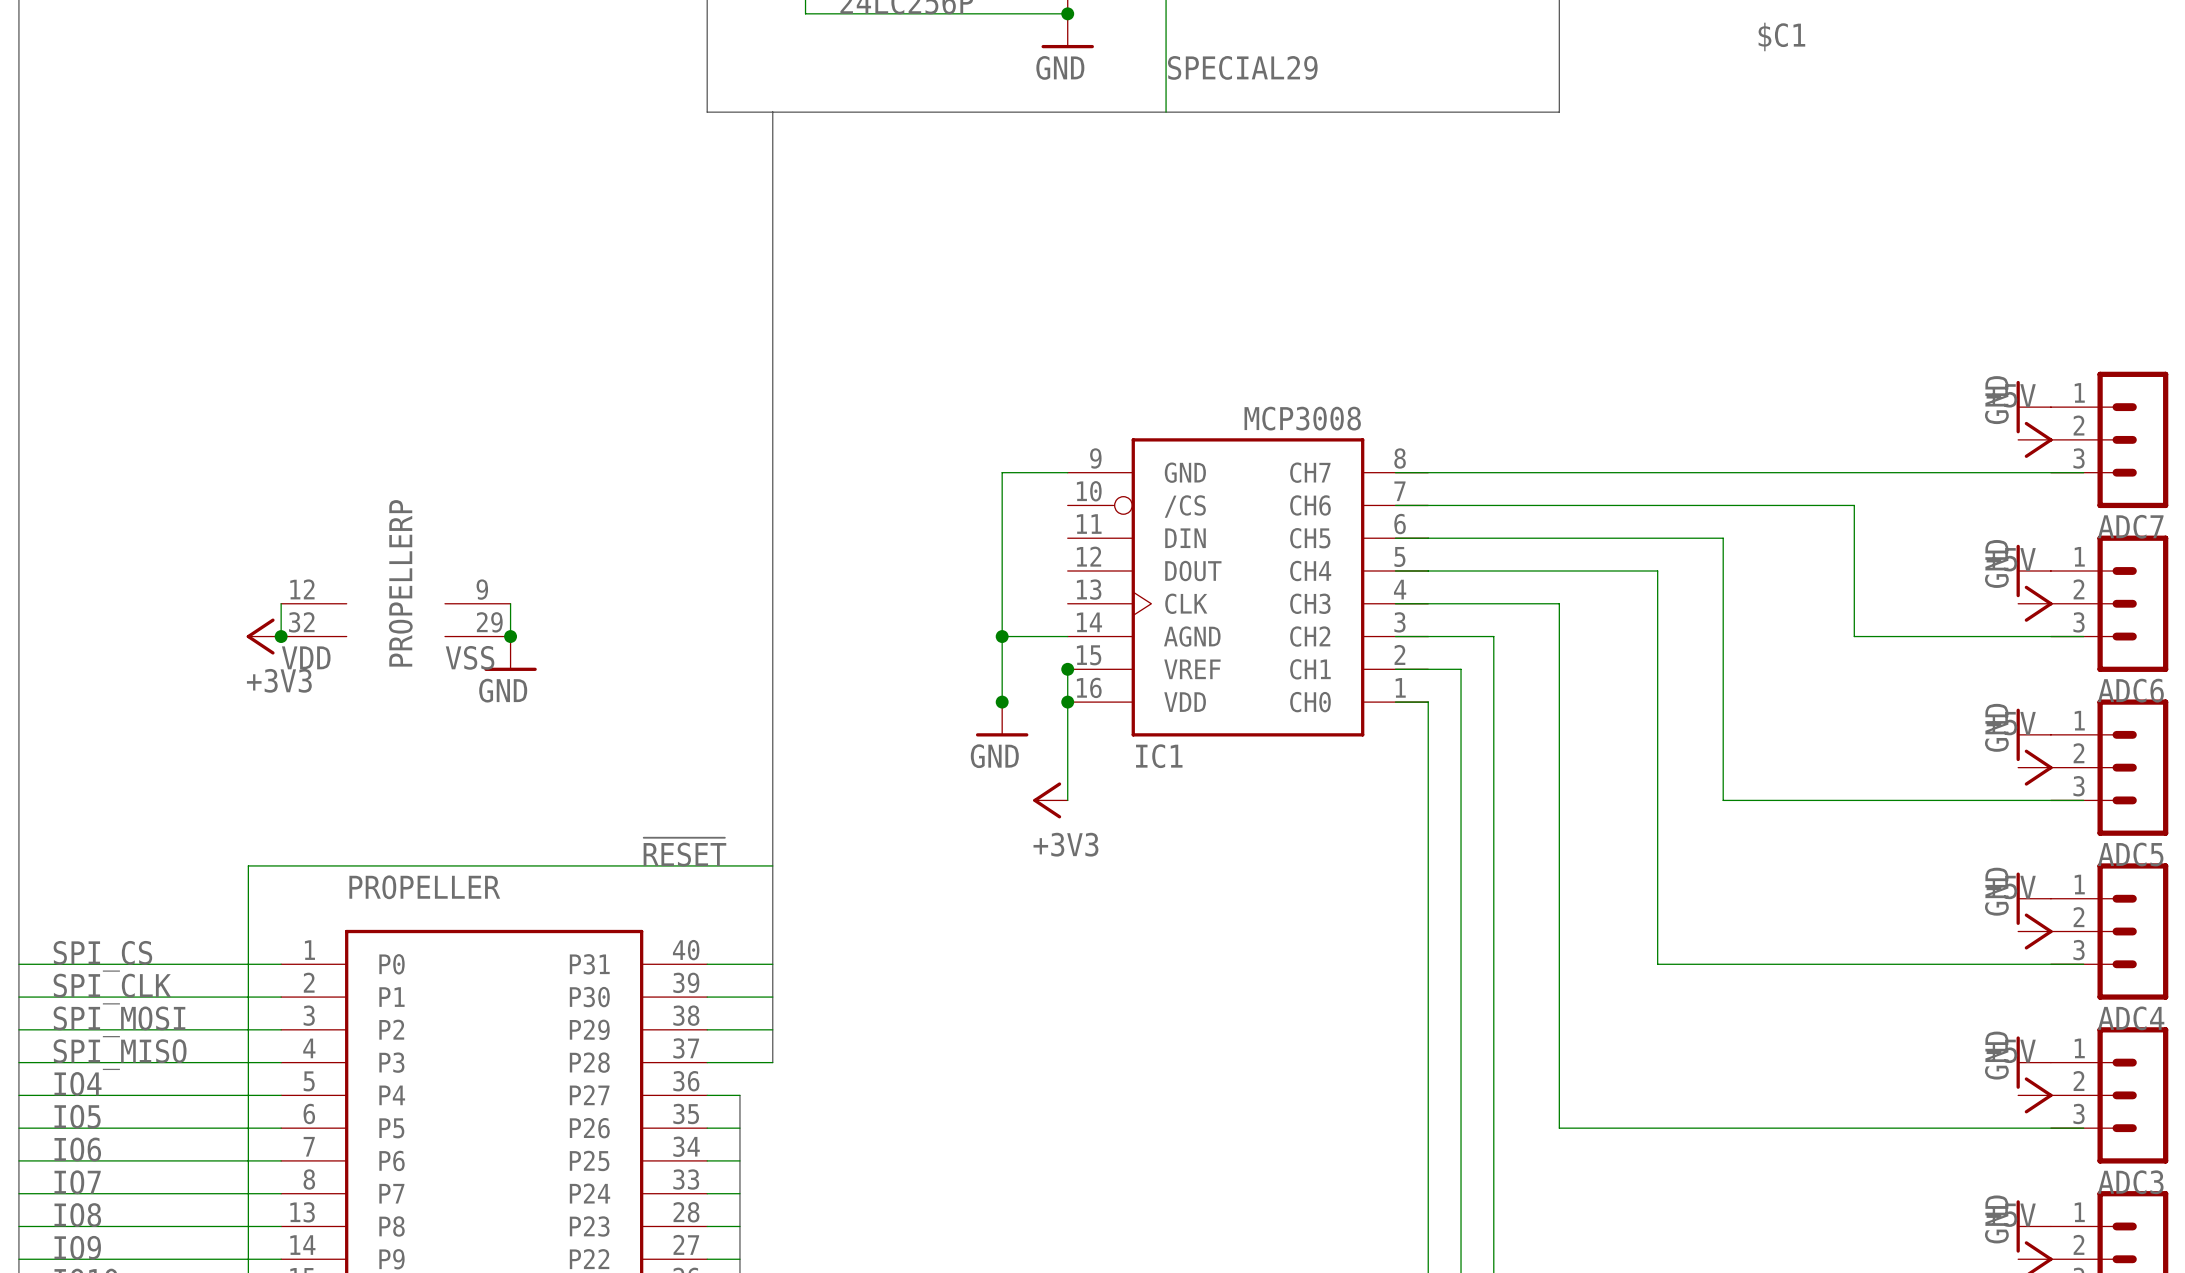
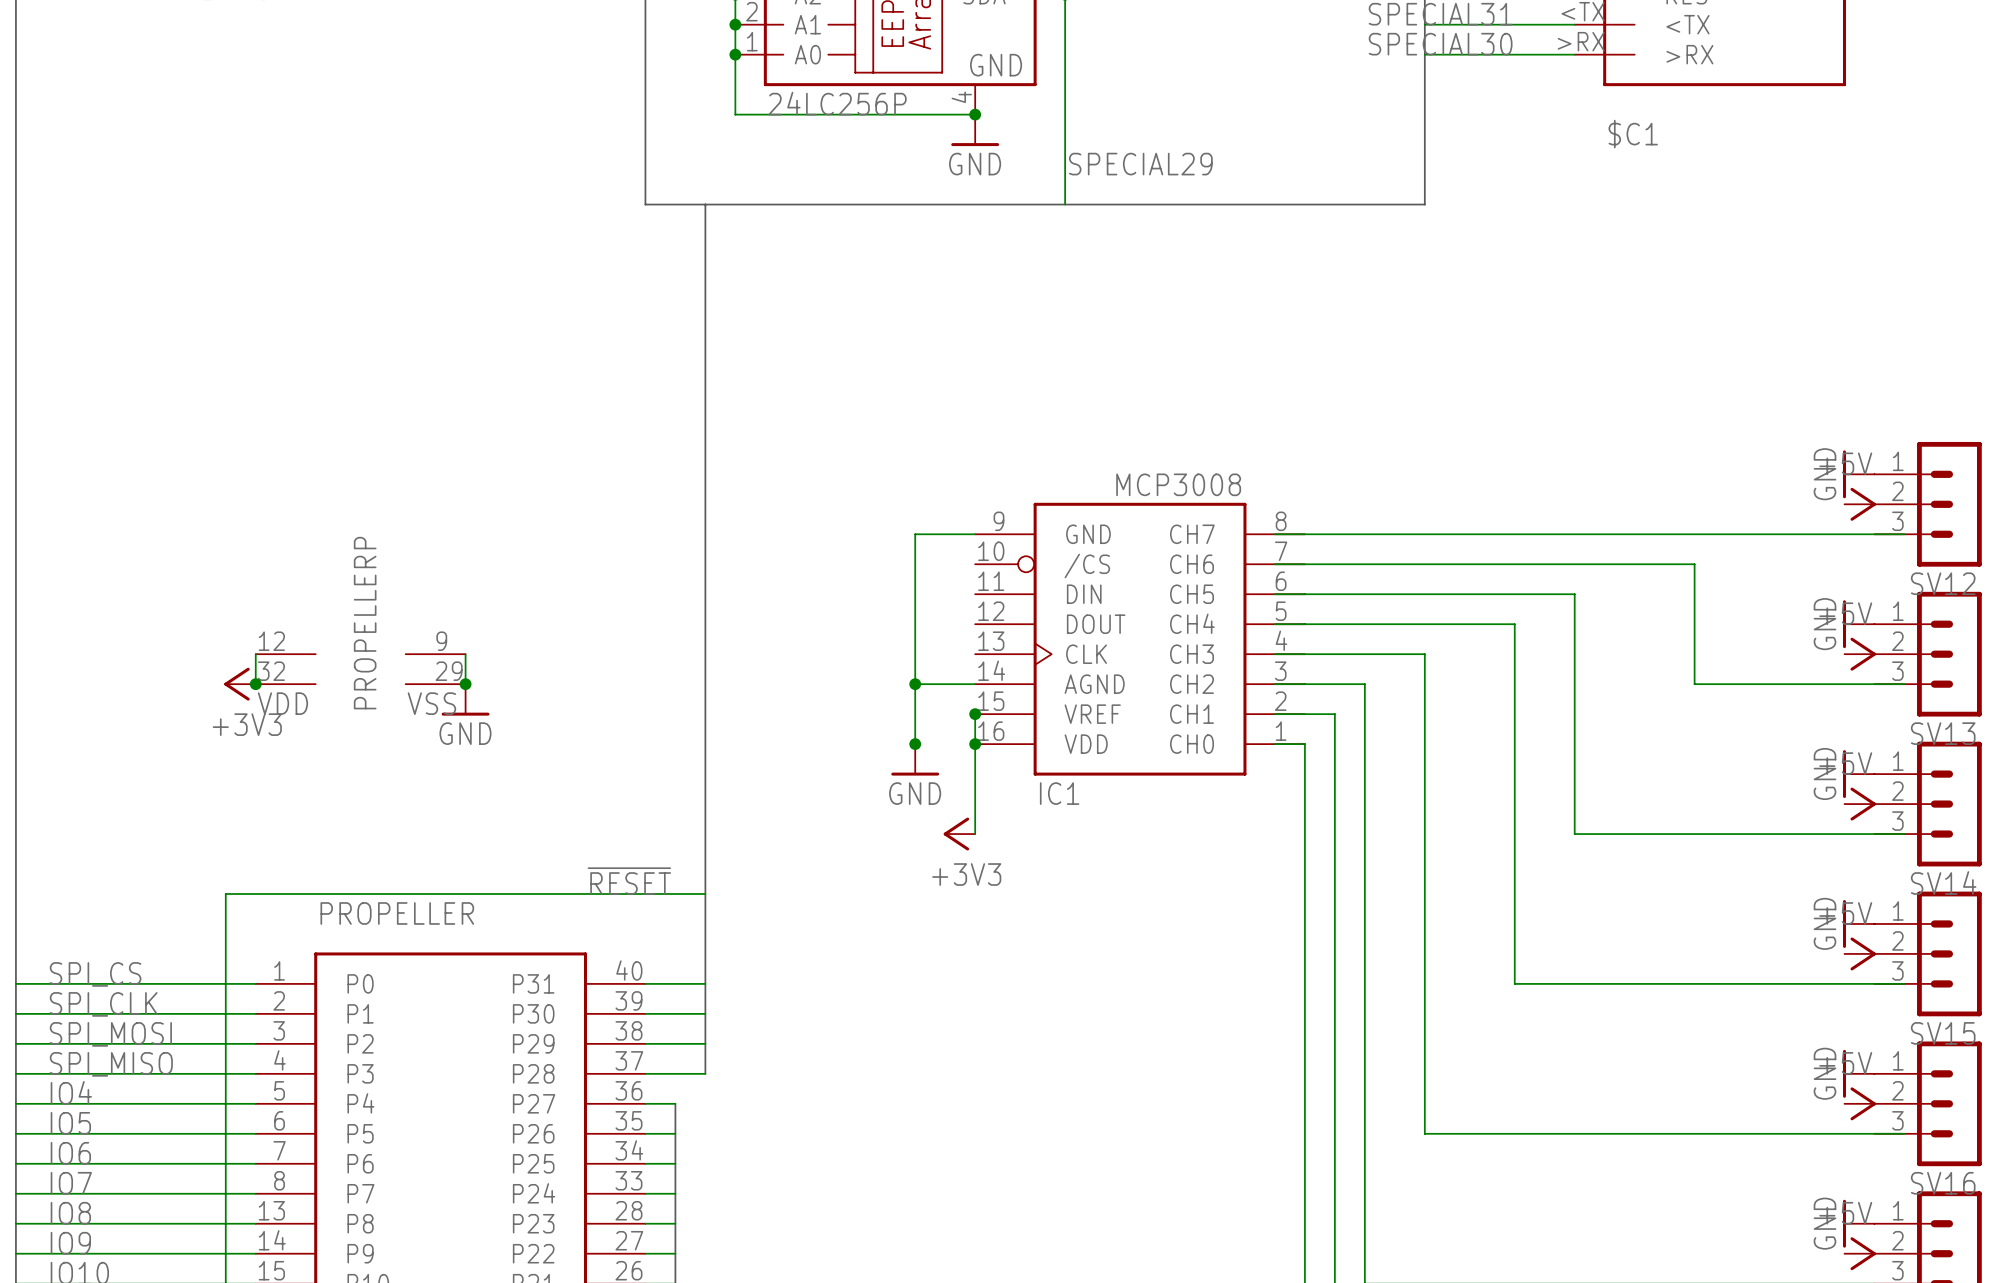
ADC7 name: ADC7 (2130, 526) -> SV12 (1943, 583)
ADC6 name: ADC6 (2130, 690) -> SV13 (1943, 733)
ADC5 name: ADC5 (2130, 854) -> SV14 (1943, 883)
ADC4 name: ADC4 (2131, 1018) -> SV15 (1943, 1033)
ADC3 name: ADC3 (2130, 1182) -> SV16 (1943, 1183)

